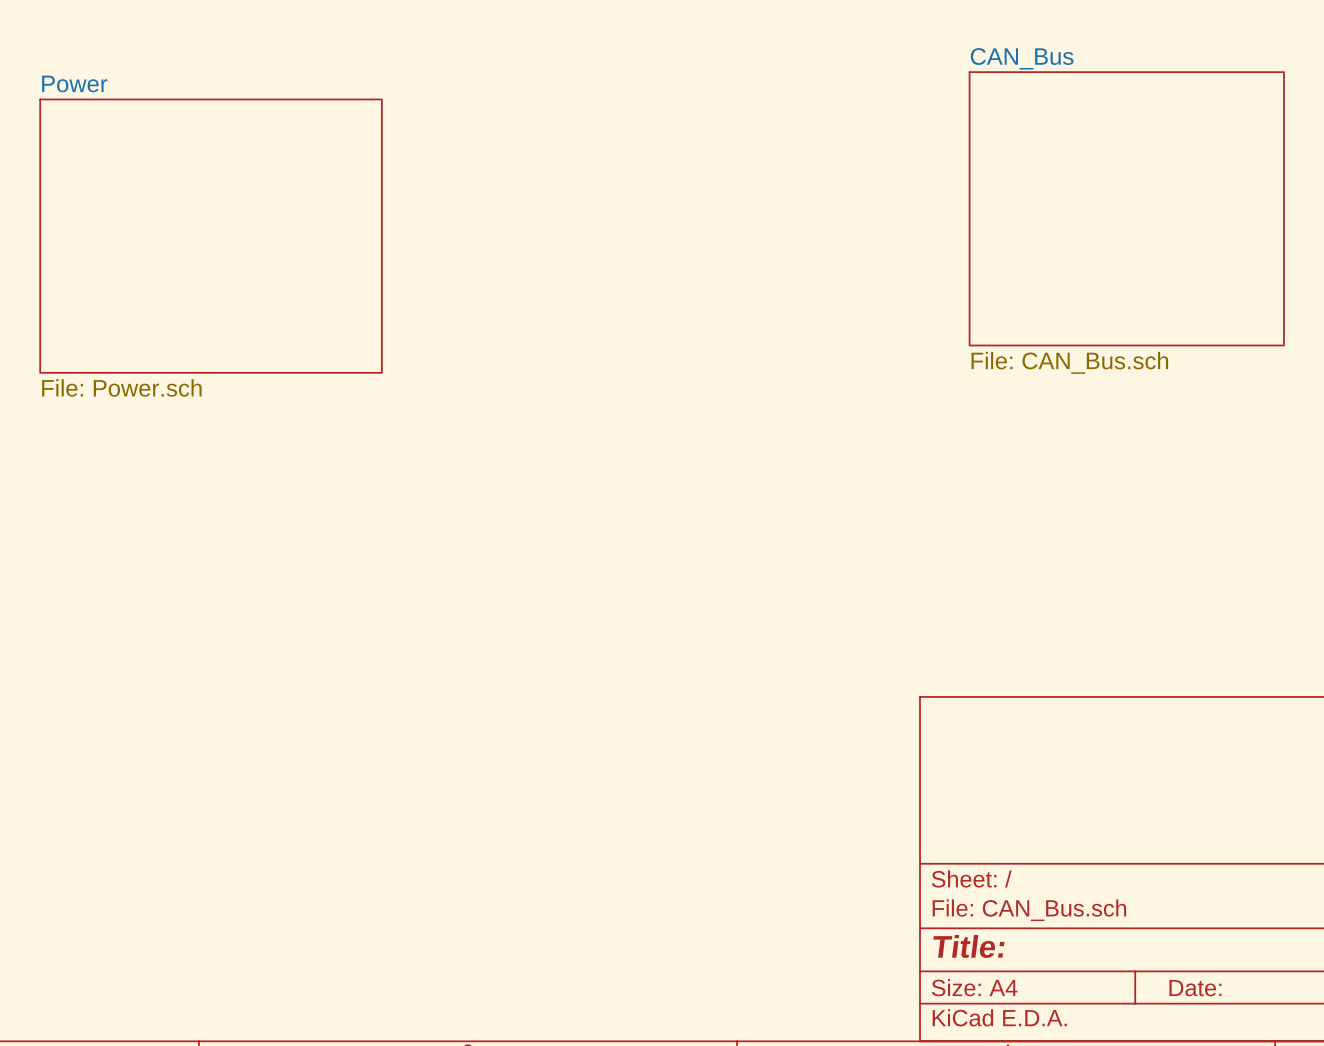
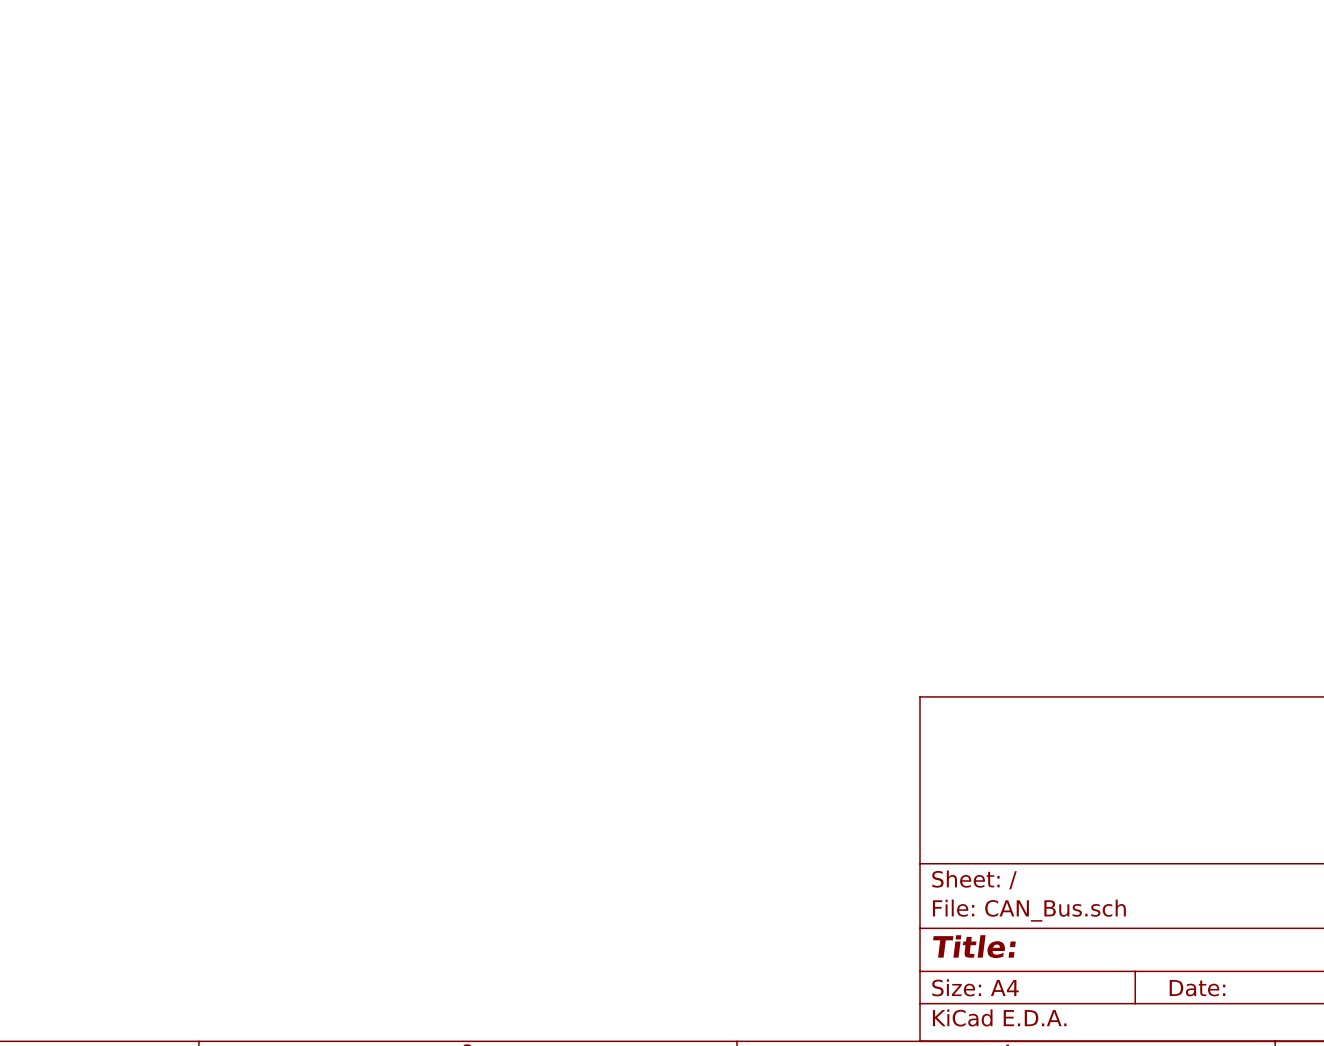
sheet CAN_Bus: File: CAN_Bus.sch (1126, 208) -> none
sheet Power: File: Power.sch (211, 236) -> none

